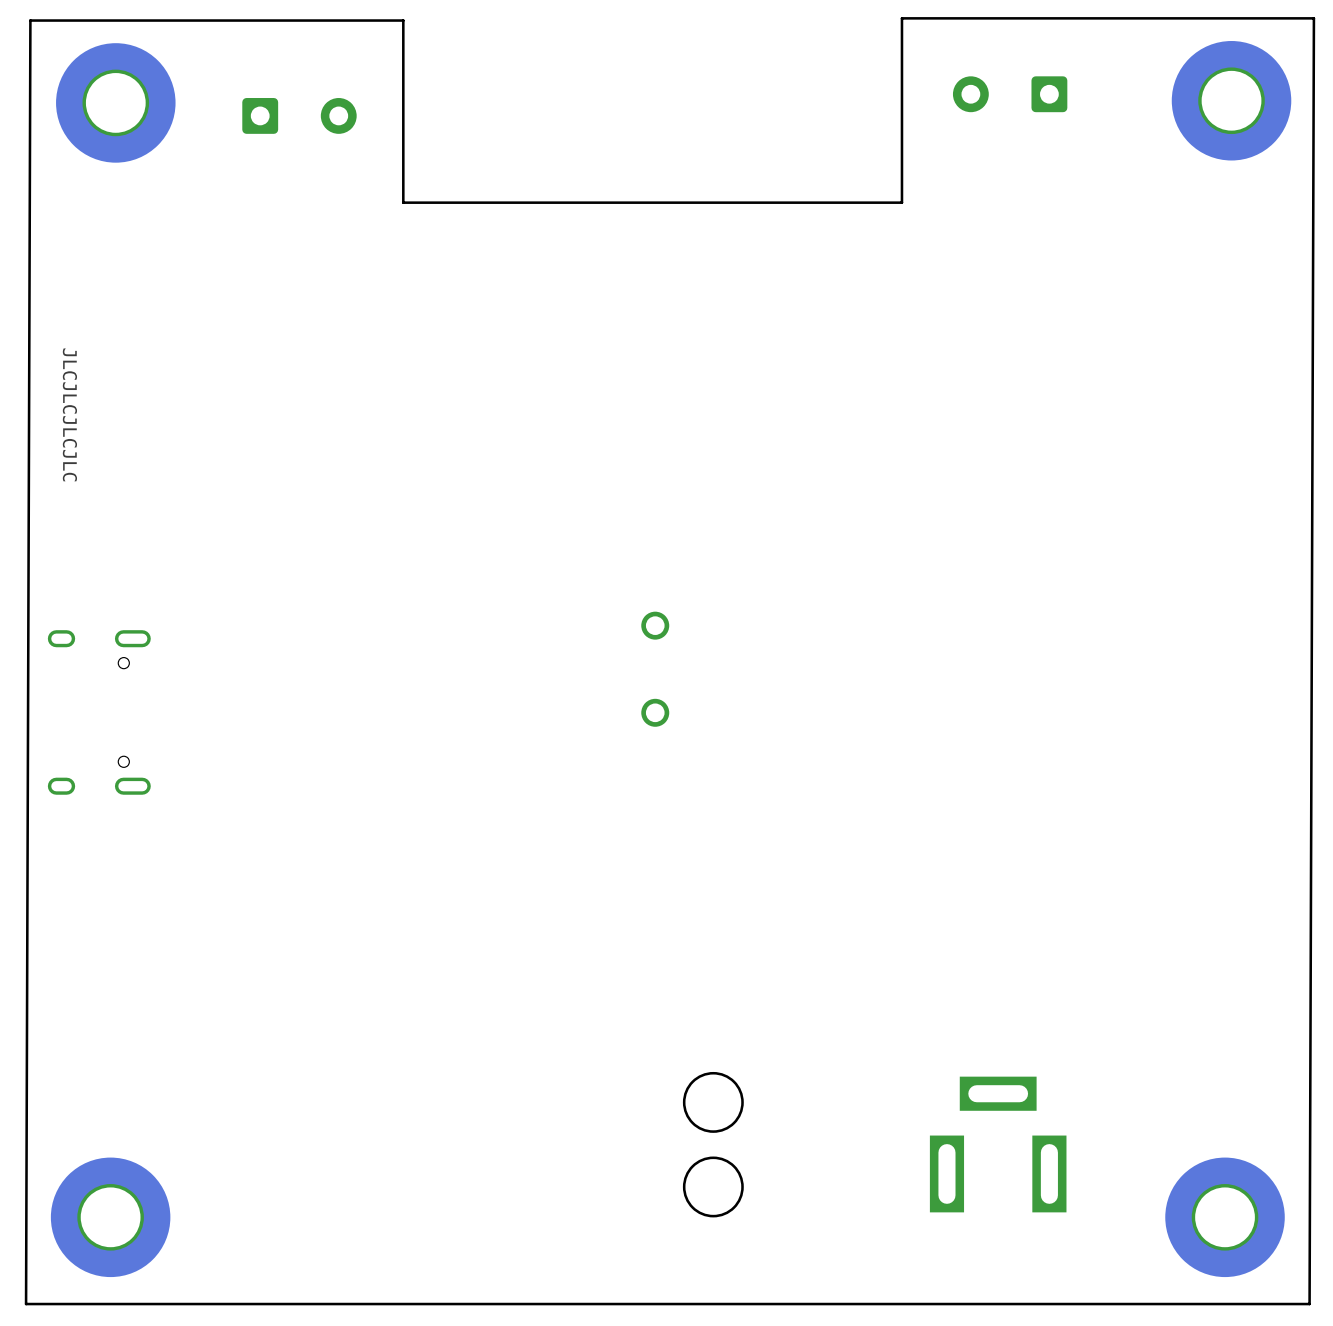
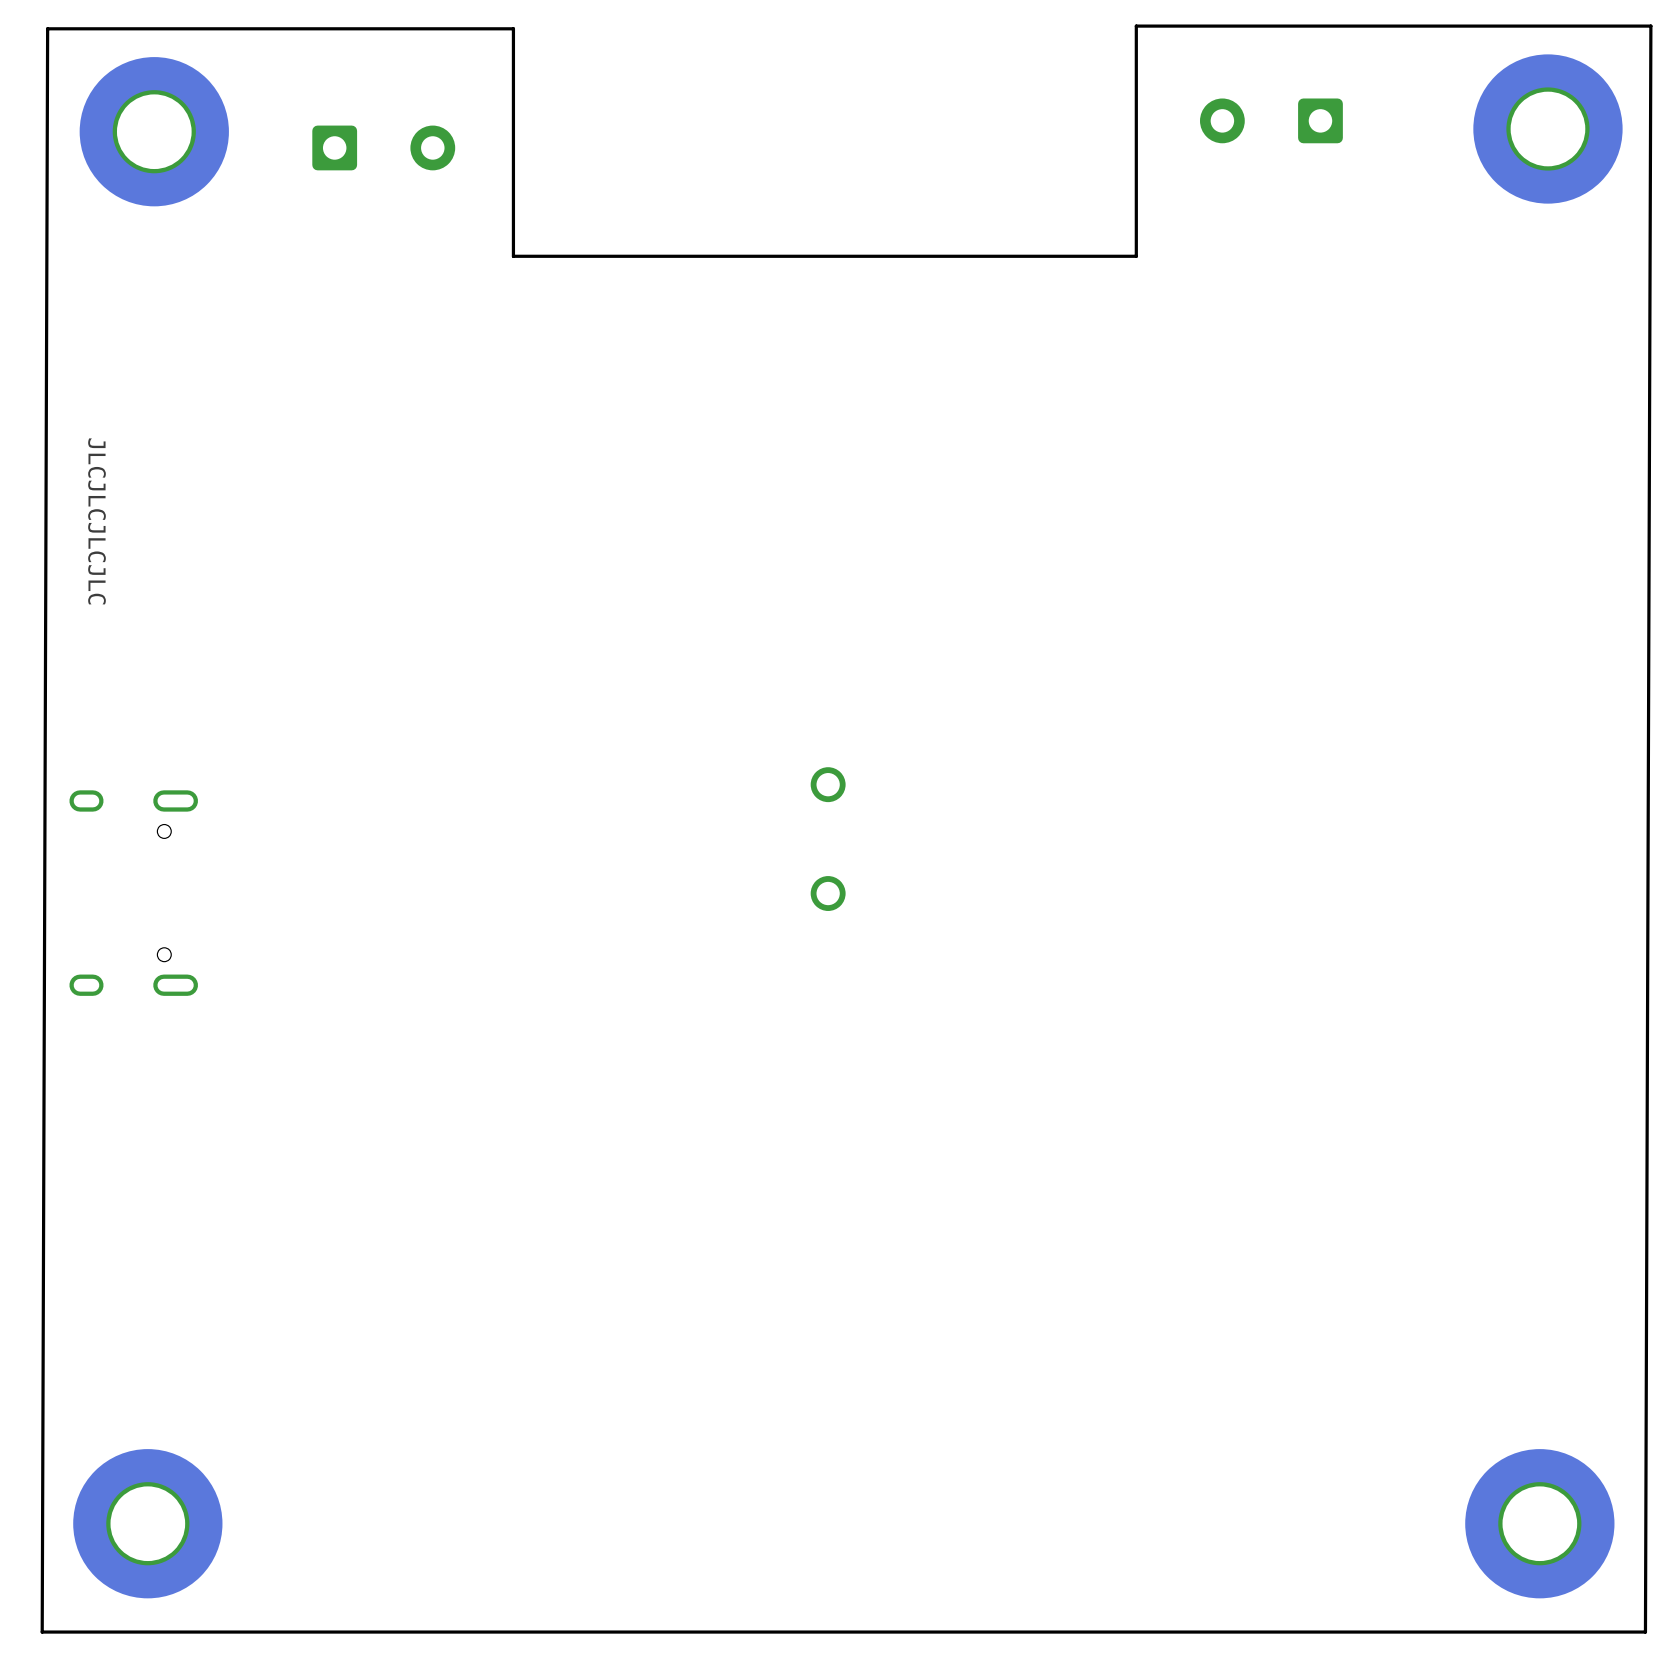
round board edge: [682, 1071, 744, 1133] -> none
part: (998, 1144) -> none
round board edge: [682, 1156, 744, 1218] -> none

